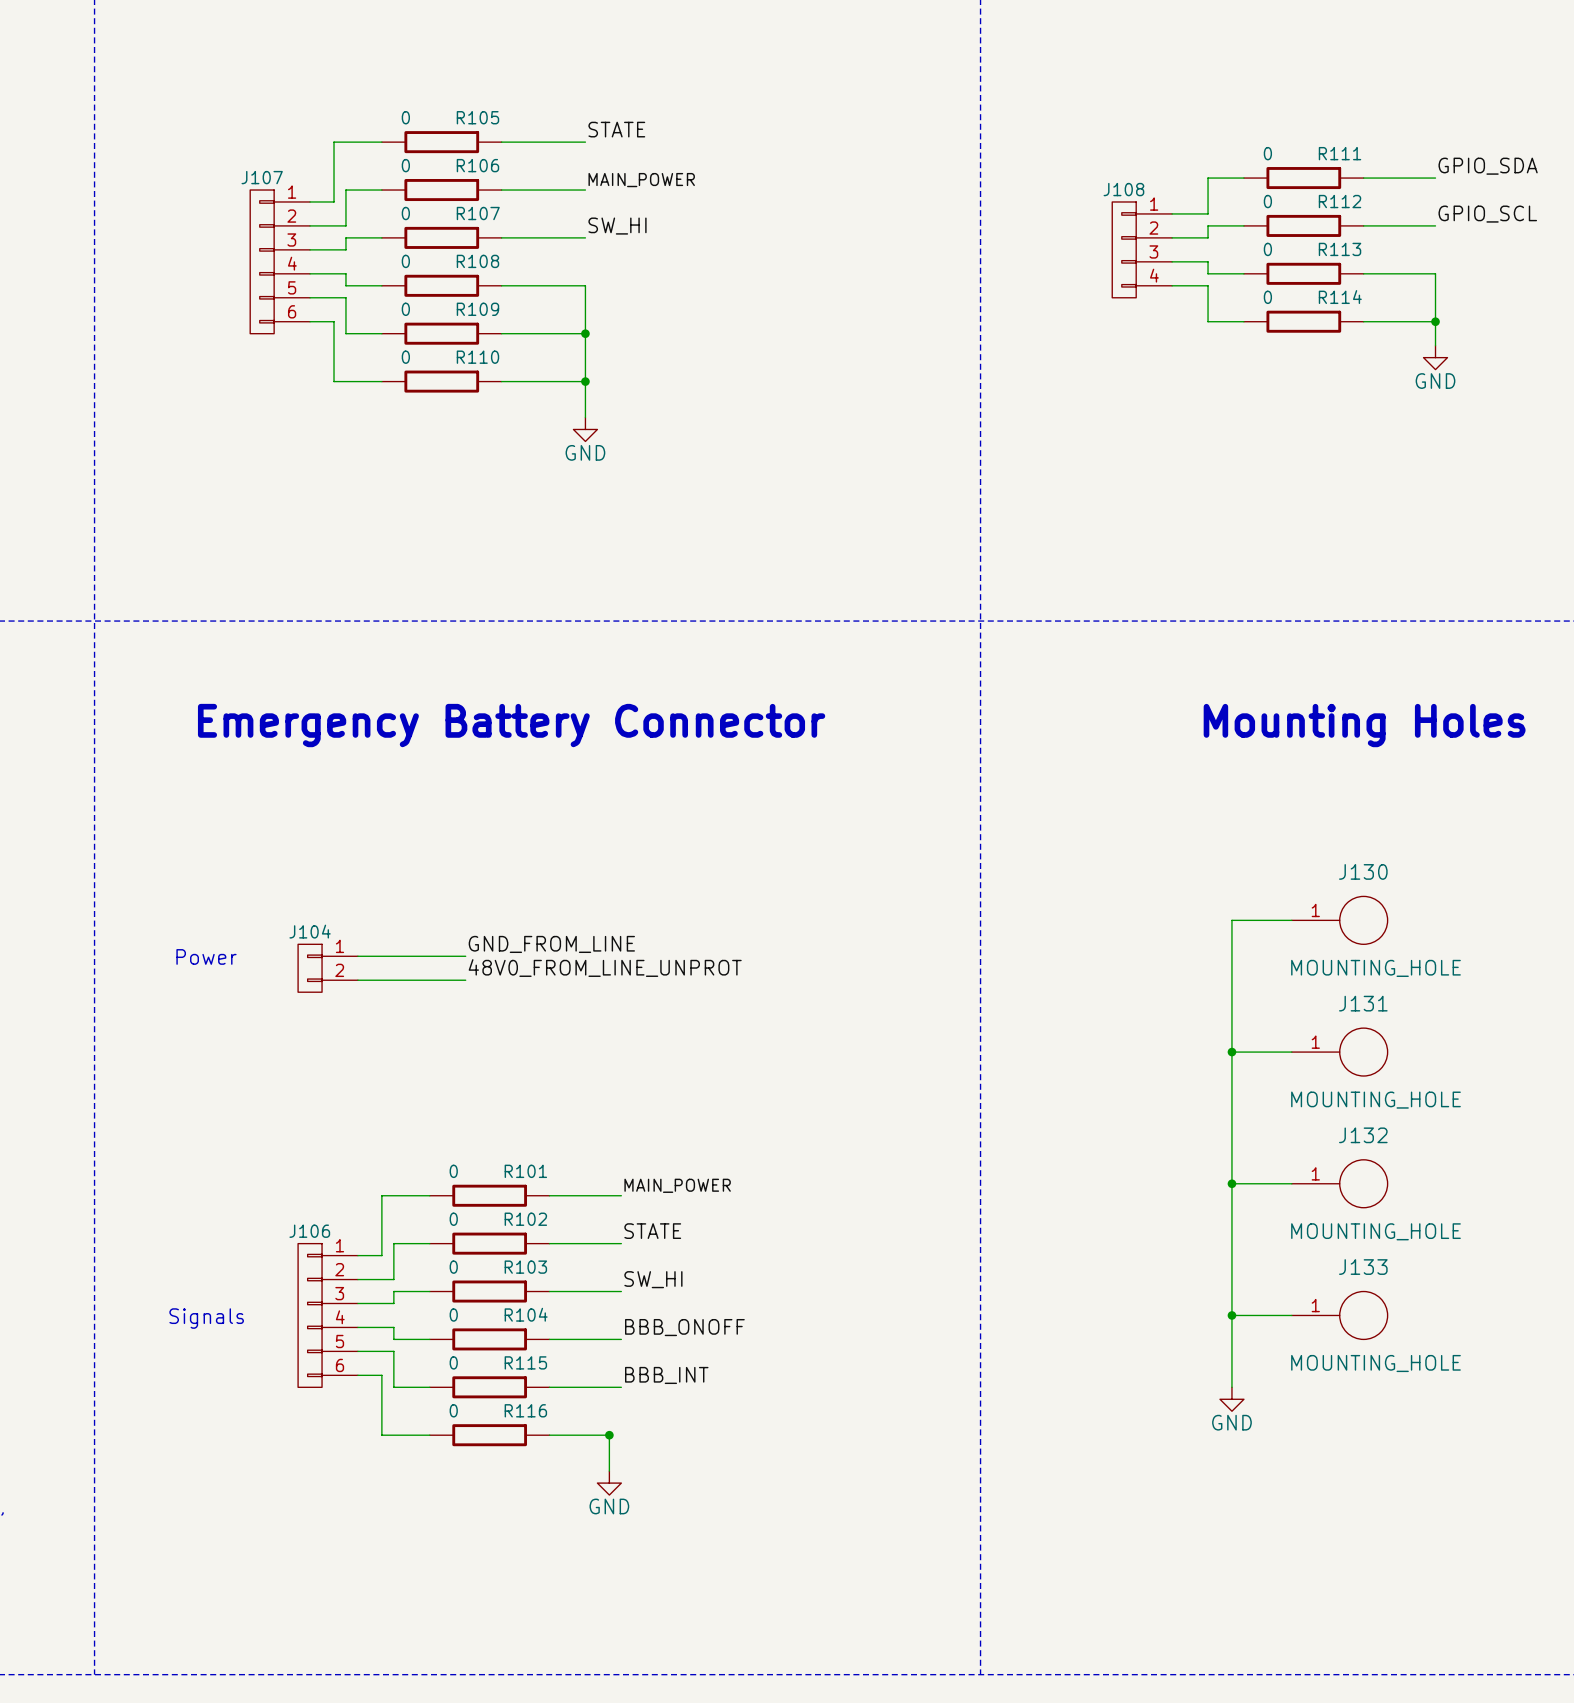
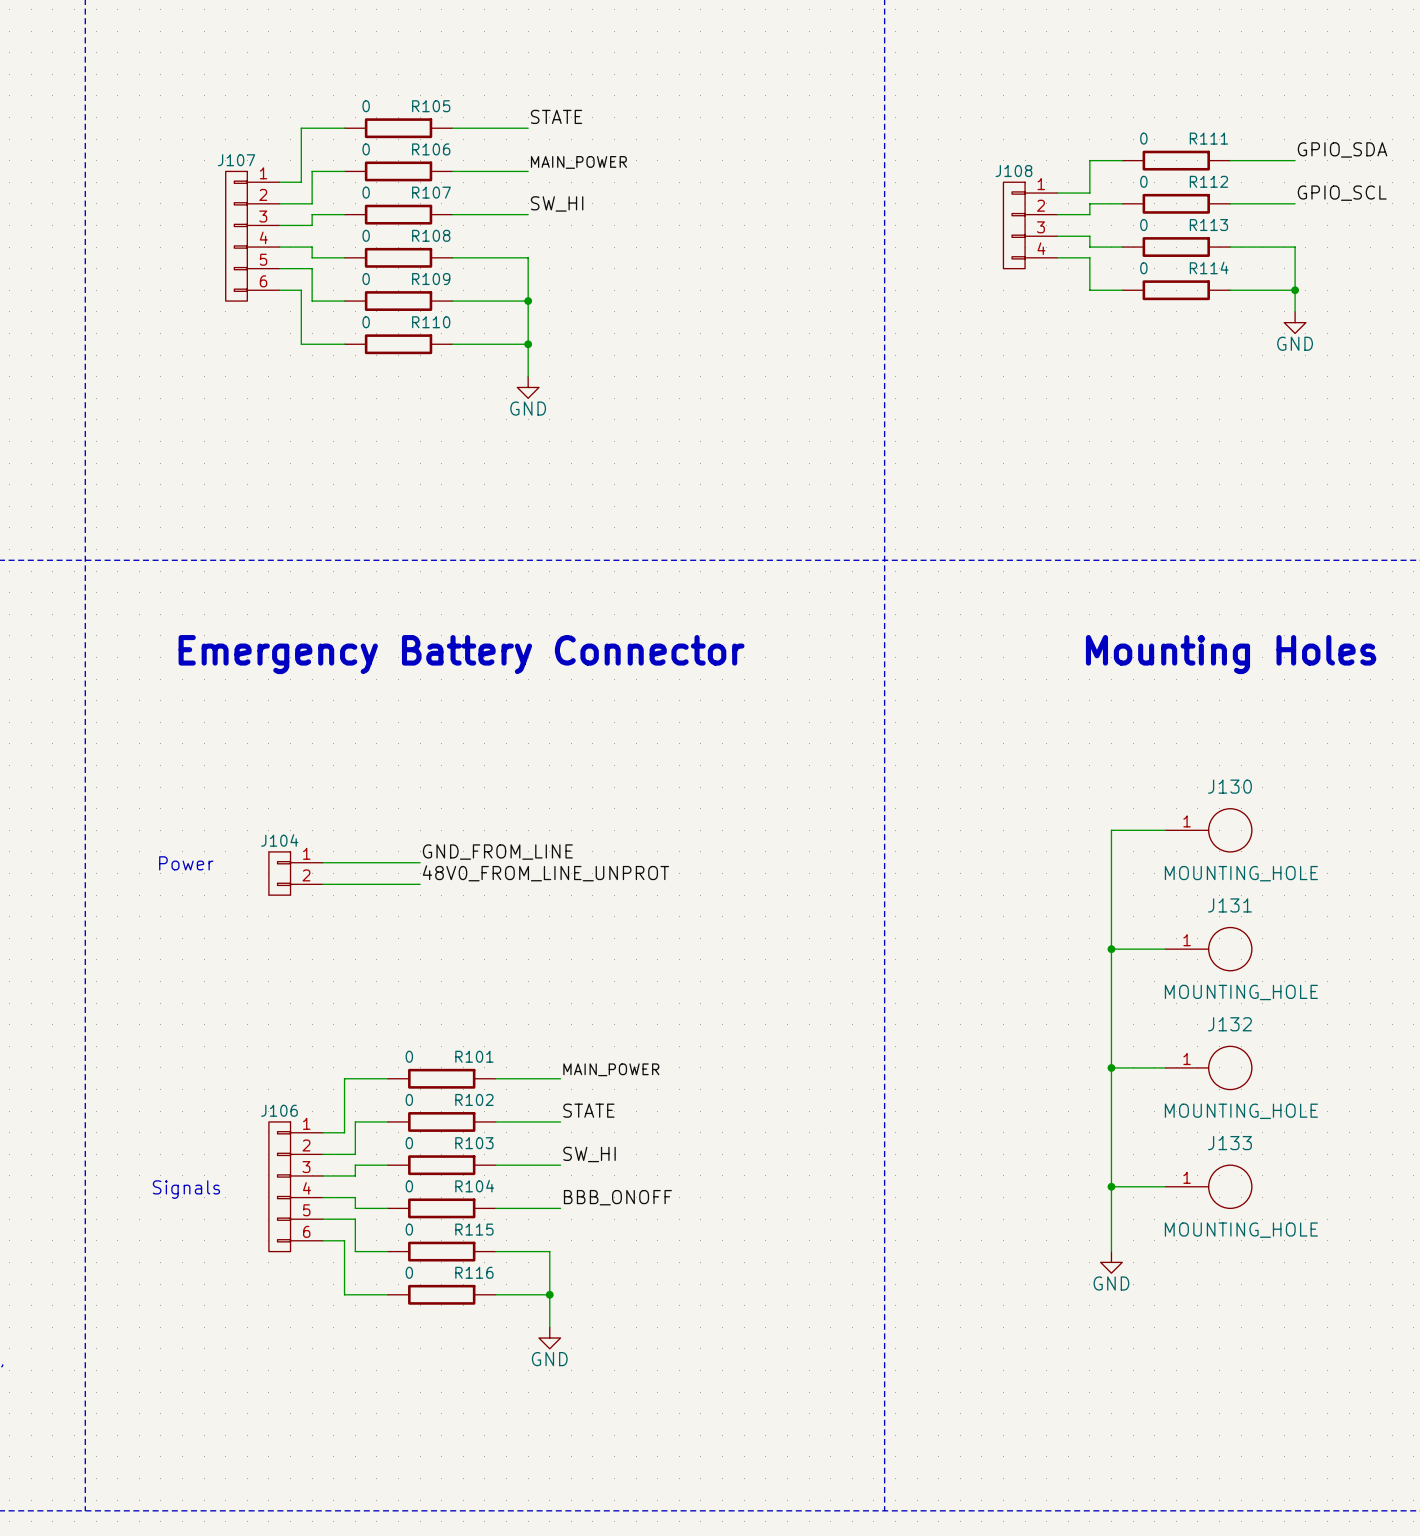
label: BBB_INT (666, 1375) -> none
wire: (609, 1387) (621, 1387) -> (549, 1251) (549, 1294)

